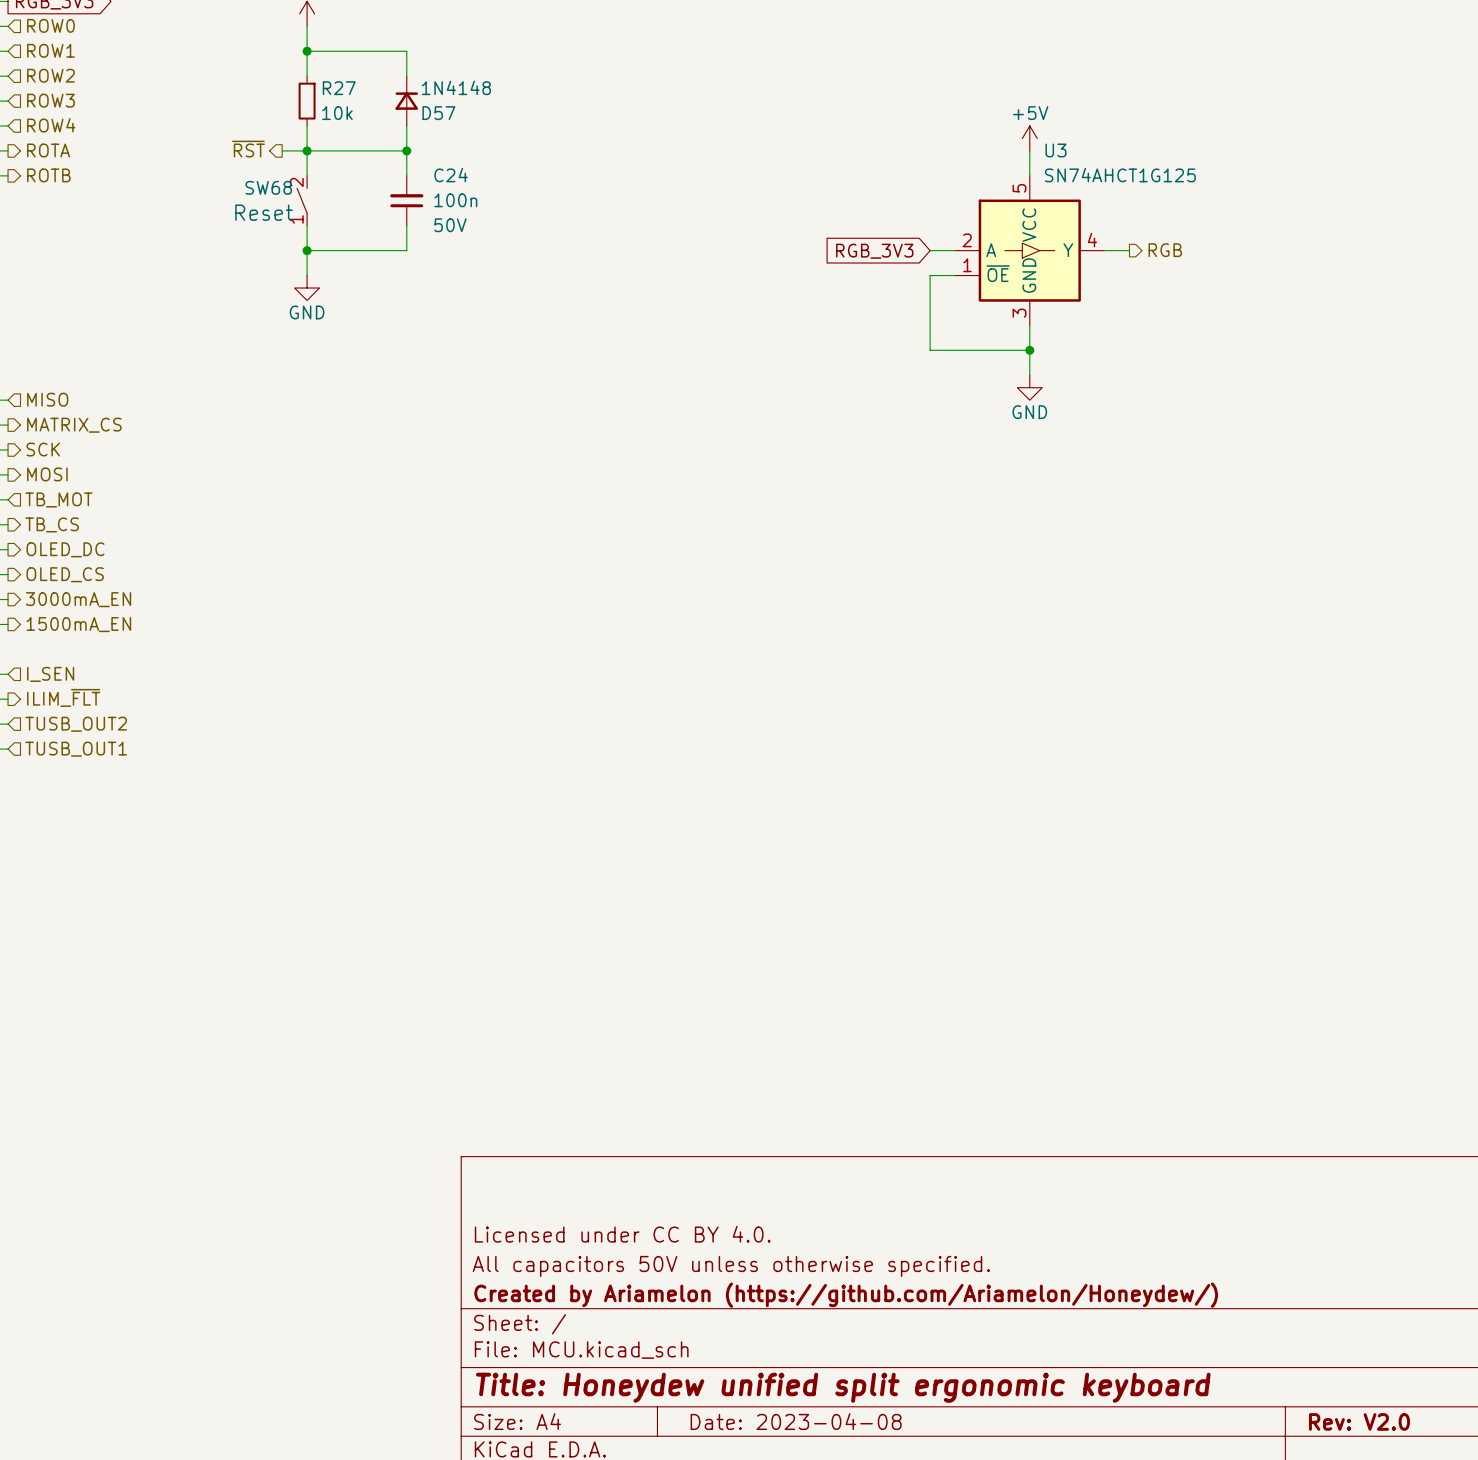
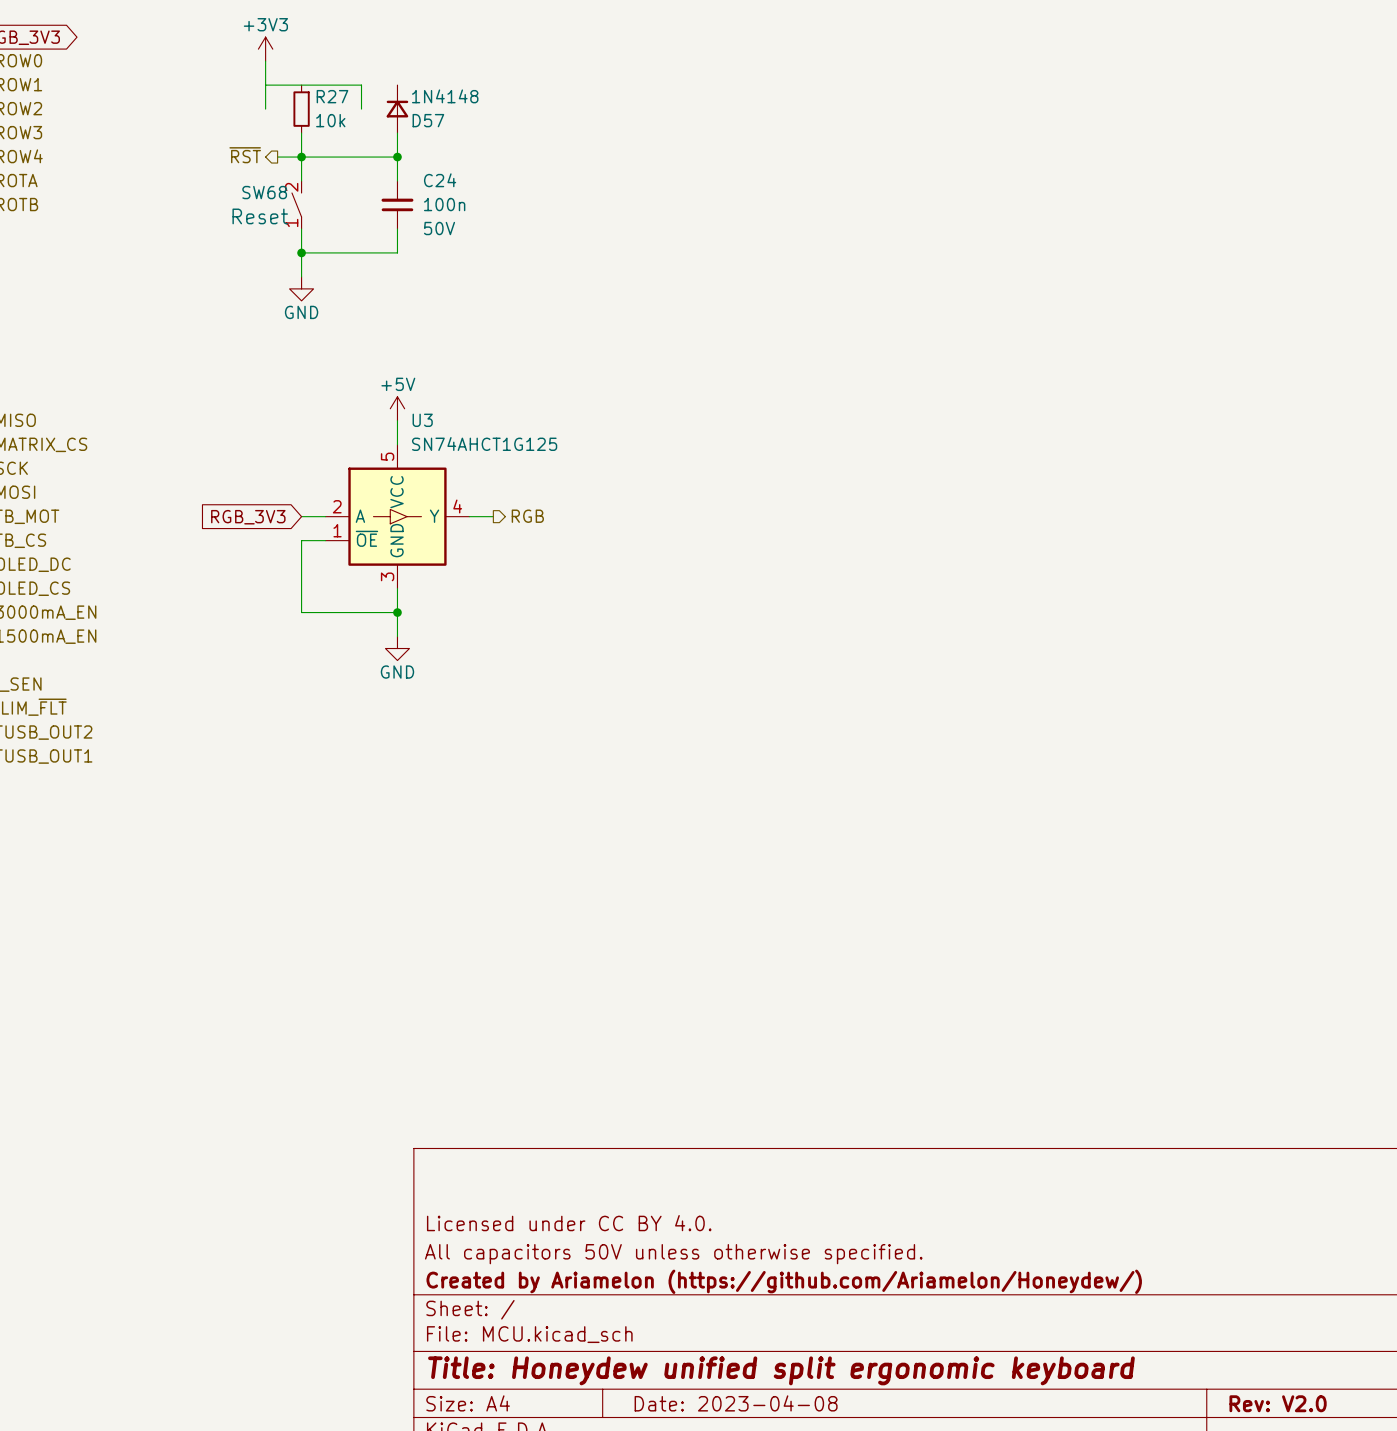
junction: (307, 51) -> none
R27 position: (307, 101) -> (301, 109)
D57 position: (406, 101) -> (397, 109)
wire: (307, 126) (307, 175) -> (301, 133) (301, 181)
junction: none -> (301, 157)
wire: (406, 126) (406, 175) -> (397, 133) (397, 181)
junction: none -> (397, 157)
power symbol: +5V (1029, 138) -> none
hierarchical label position: ~{RST} (248, 149) -> ~{RST} (245, 155)
wire: (282, 150) (406, 150) -> (277, 157) (397, 157)
junction: (307, 150) -> none
junction: (406, 150) -> none
wire: (1029, 150) (1029, 175) -> none
SW68 position: (302, 200) -> (296, 204)
C24 position: (406, 200) -> (397, 204)
wire: (307, 225) (307, 275) -> (301, 228) (301, 276)
junction: none -> (301, 252)
wire: (406, 225) (406, 250) (307, 250) -> (397, 228) (397, 252) (301, 252)
junction: (307, 250) -> none
wire: (930, 250) (955, 250) -> none
U3 position: (1029, 250) -> (397, 516)
wire: (1104, 250) (1129, 250) -> none
hierarchical label: RGB (1165, 250) -> none
global label: RGB_3V3 (874, 251) -> none
wire: (955, 275) (930, 275) (930, 350) (1029, 350) -> none
power symbol position: GND (307, 288) -> GND (301, 288)
wire: (1029, 325) (1029, 375) -> none
junction: (1029, 350) -> none
power symbol: none -> +5V (397, 408)
power symbol: GND (1029, 387) -> none
wire: none -> (397, 420) (397, 444)
wire: none -> (301, 516) (325, 516)
wire: none -> (469, 516) (493, 516)
hierarchical label: none -> RGB (527, 516)
global label: none -> RGB_3V3 (248, 517)
wire: none -> (325, 540) (301, 540) (301, 612) (397, 612)
wire: none -> (397, 588) (397, 636)
junction: none -> (397, 612)
power symbol: none -> GND (397, 648)

